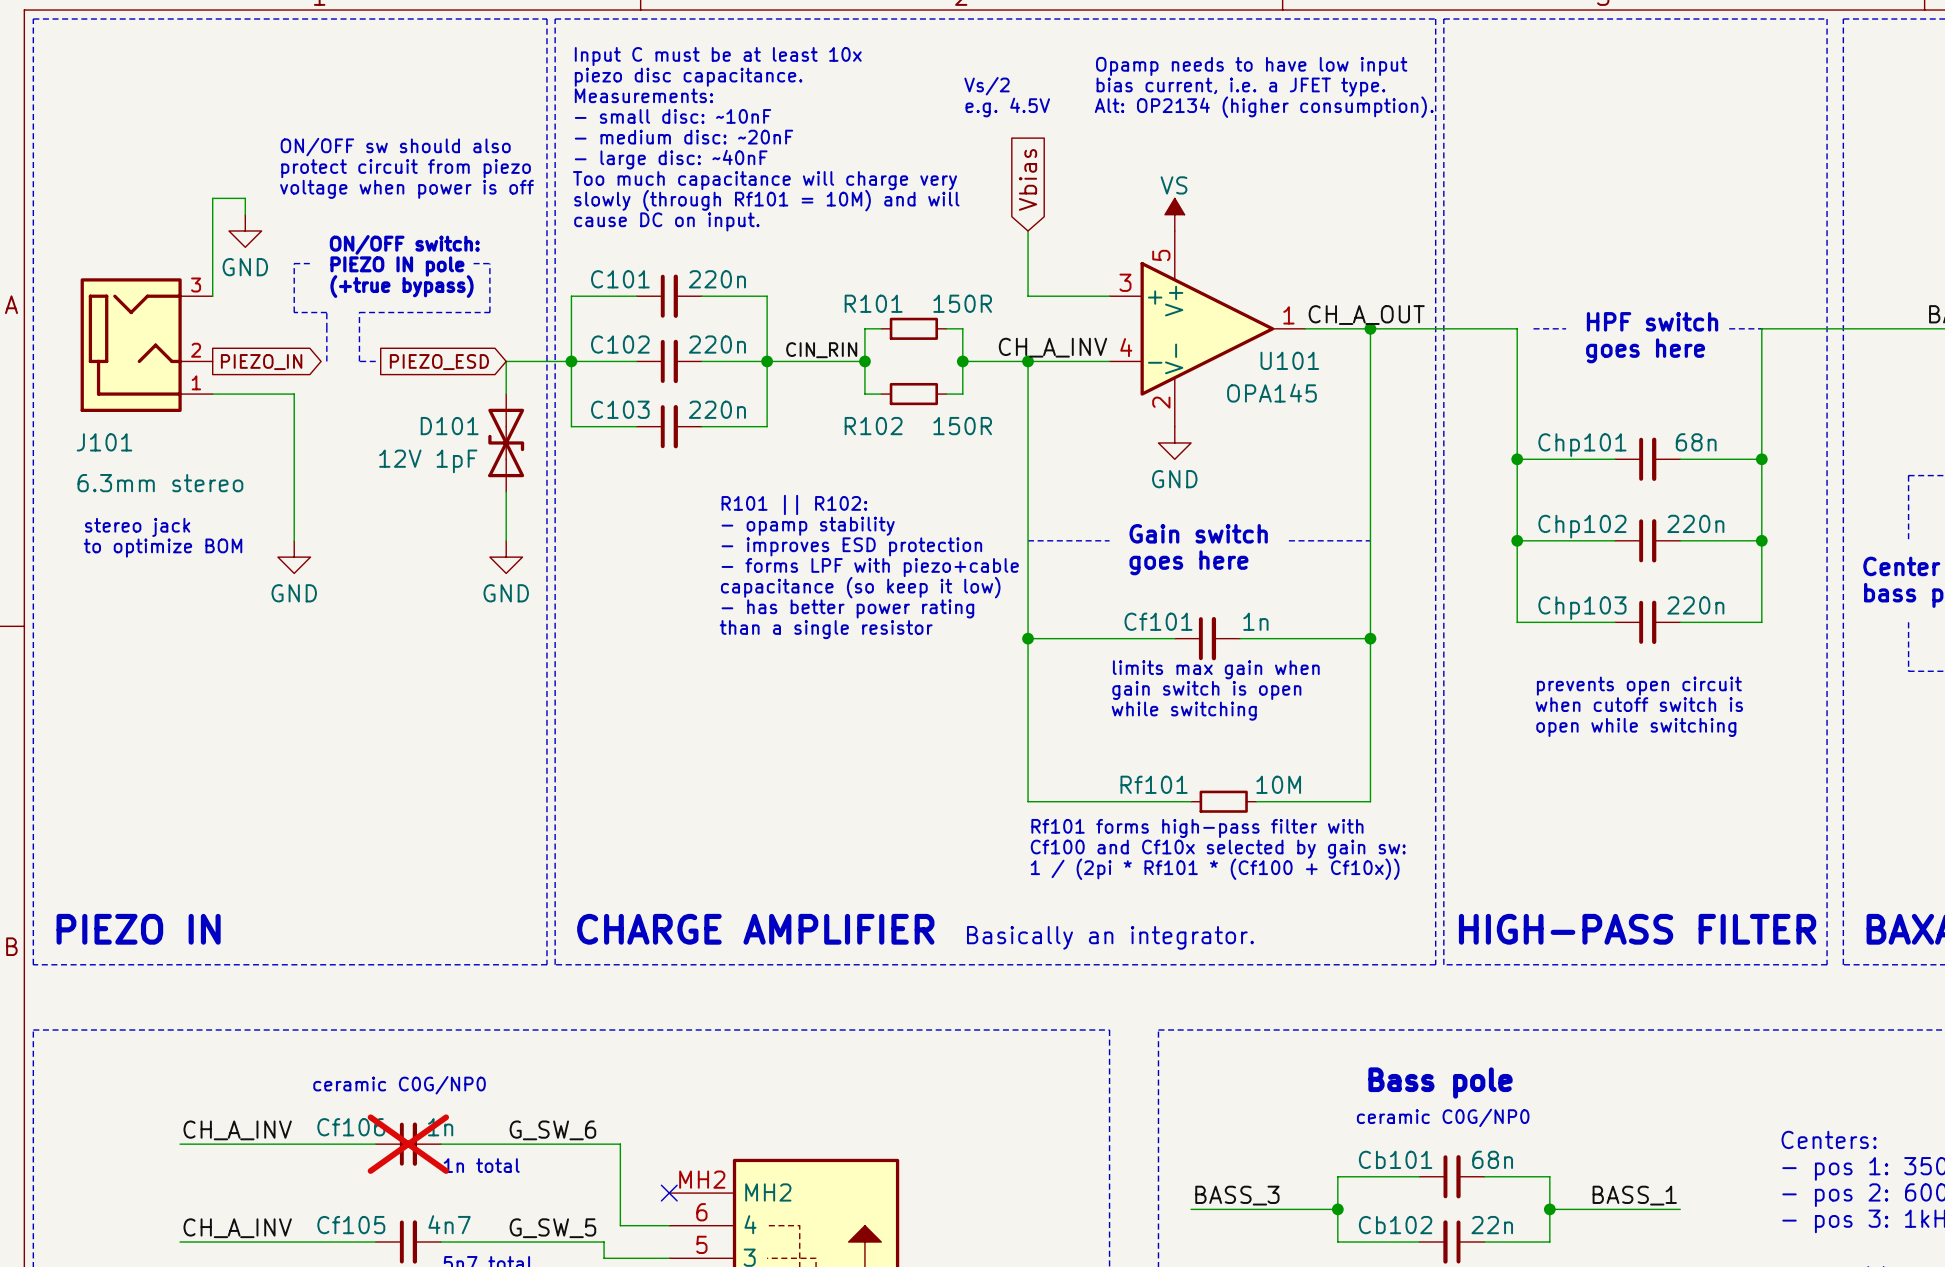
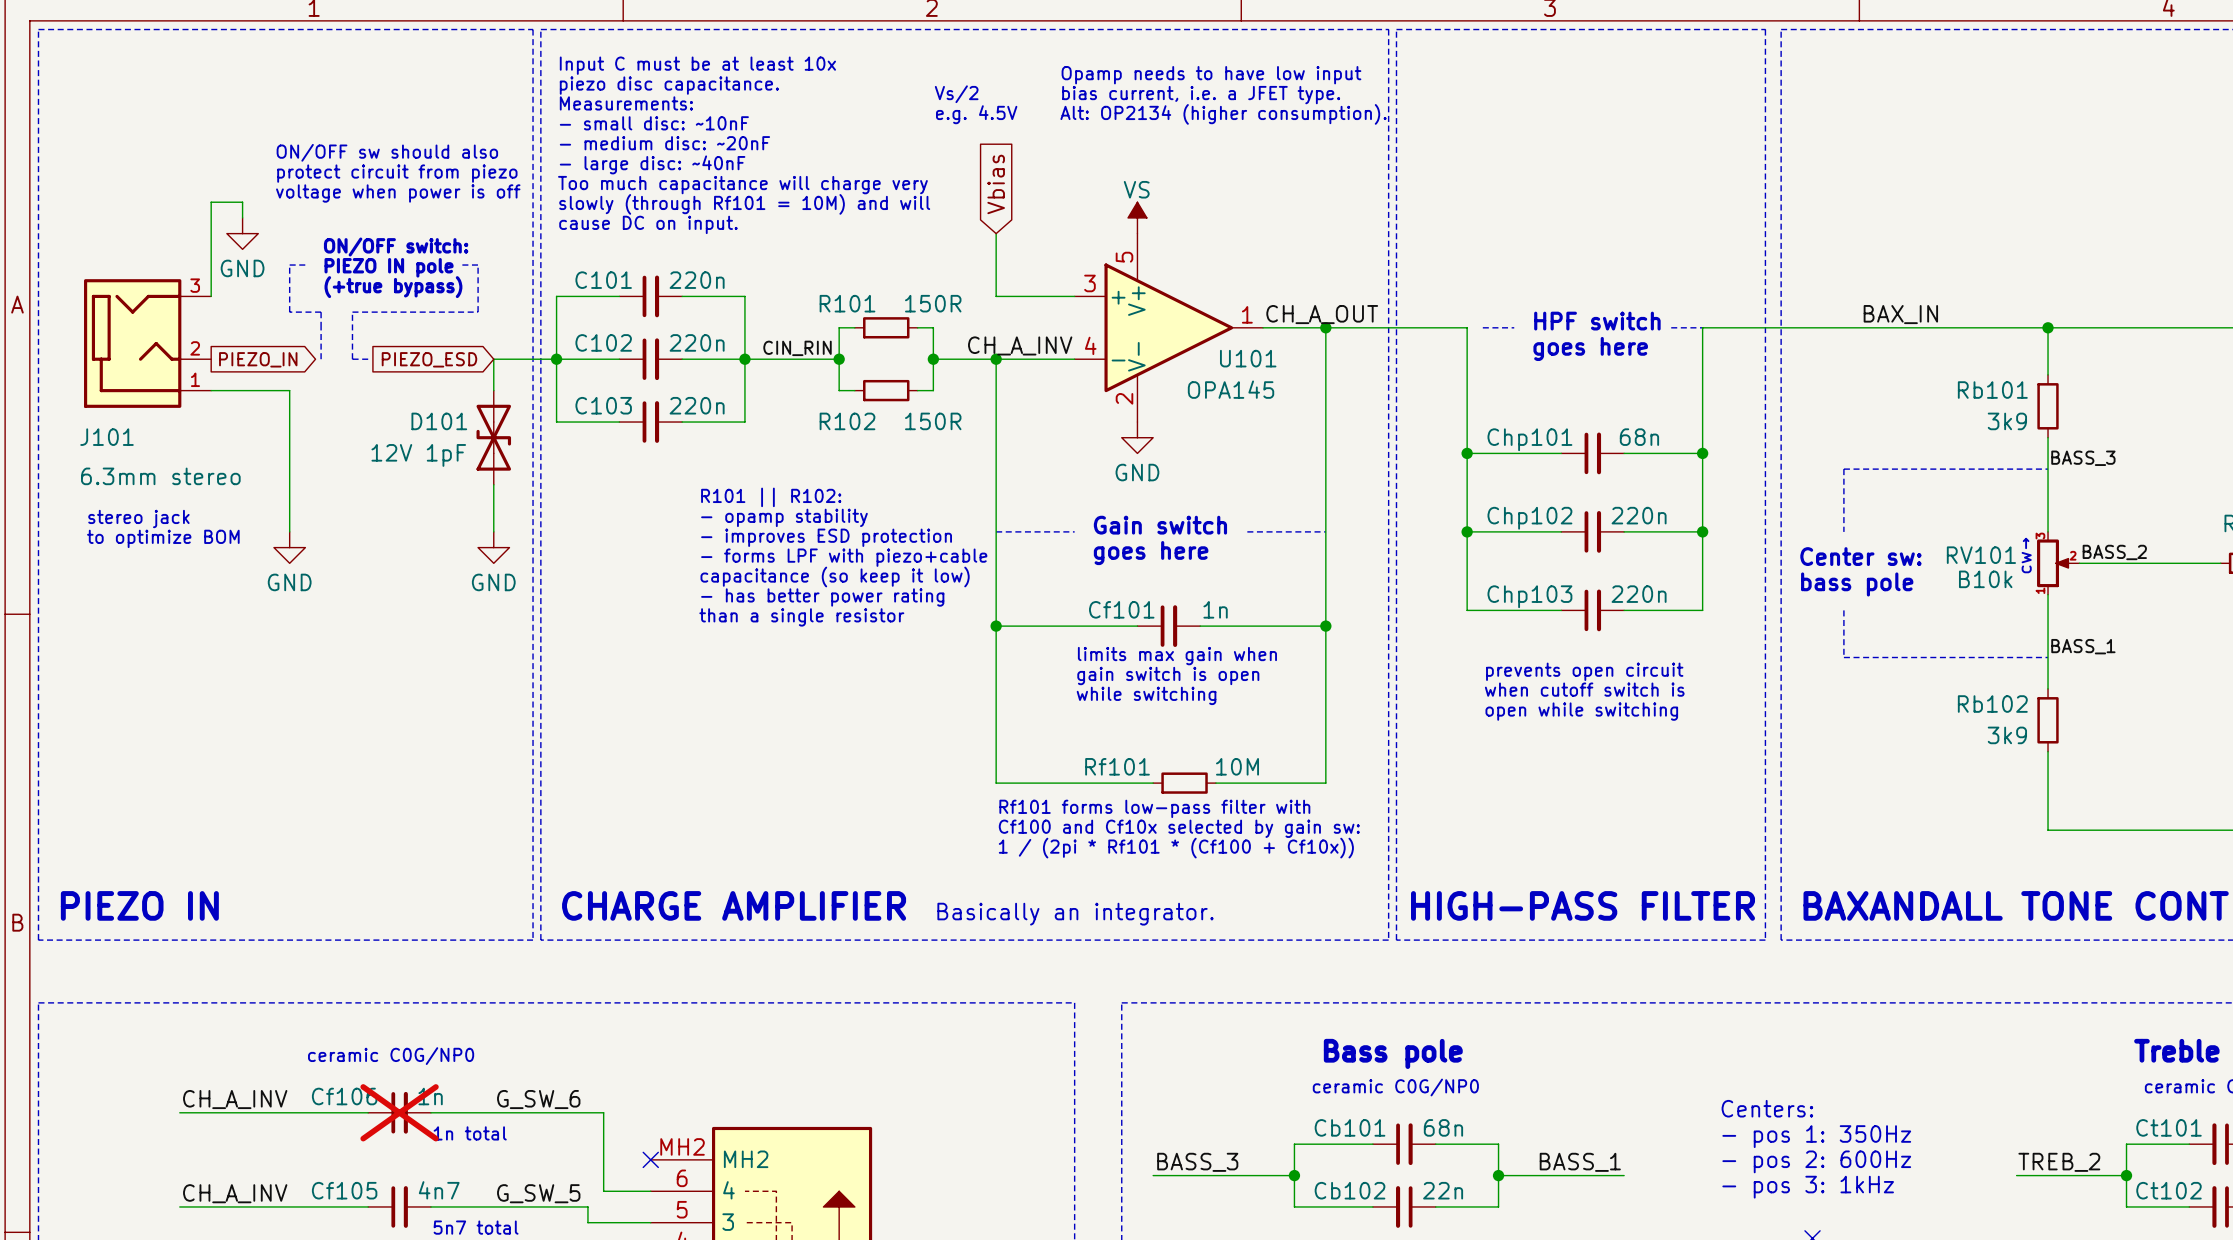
text: Rf101 forms high-pass filter with (1197, 828) -> Rf101 forms low-pass filter with (1154, 808)

